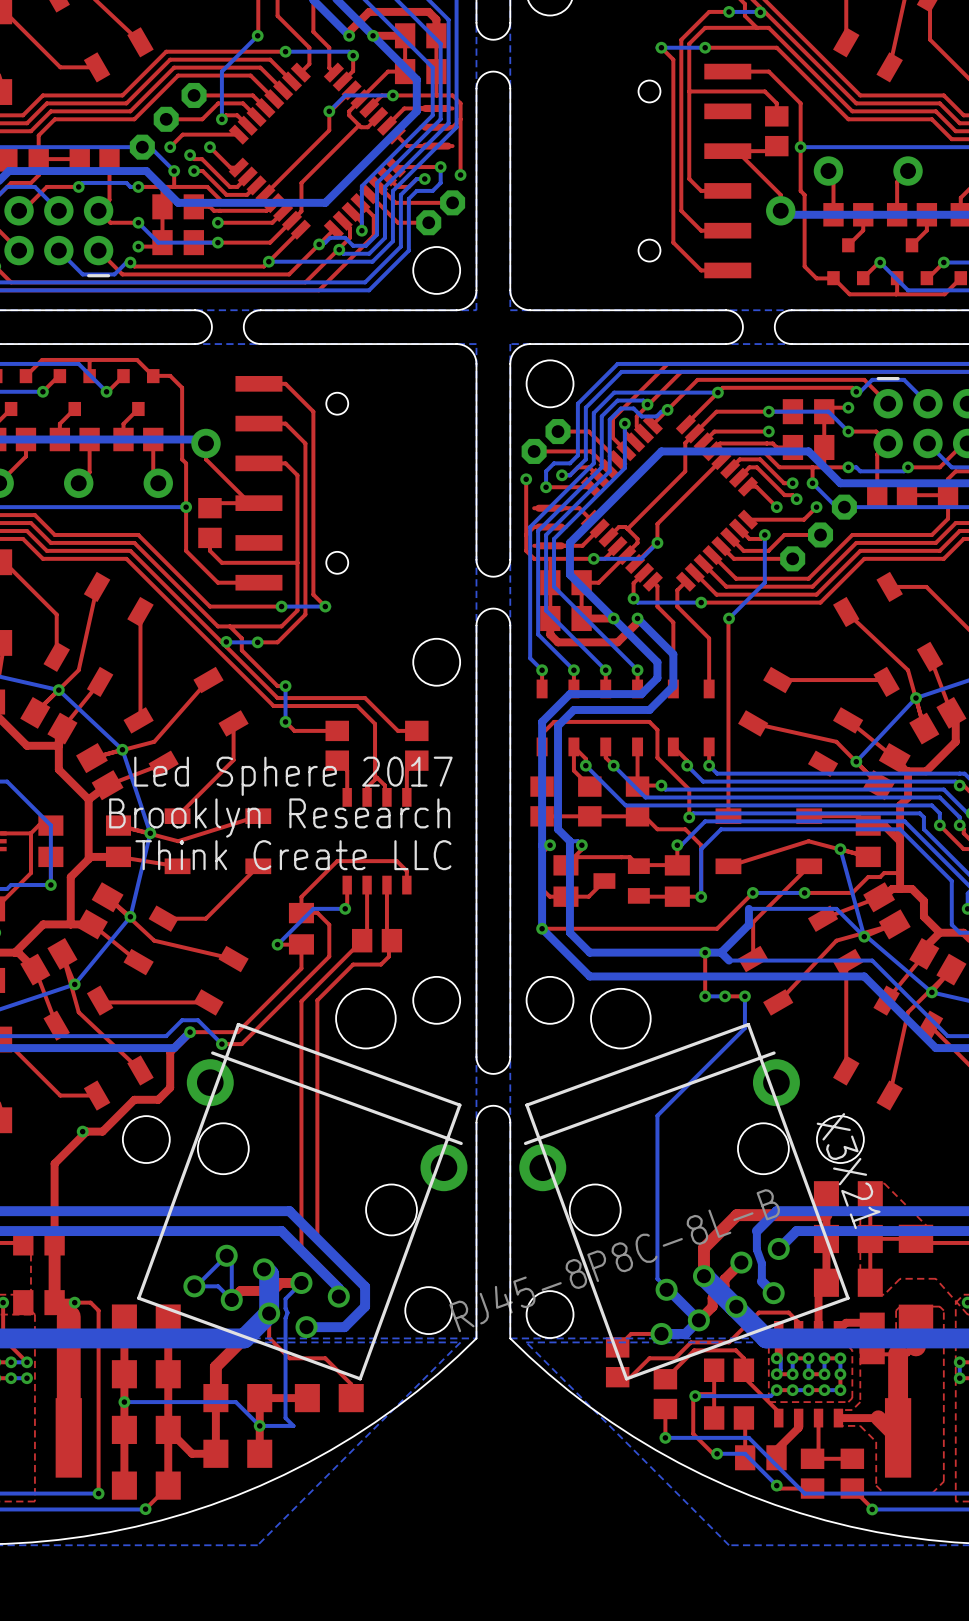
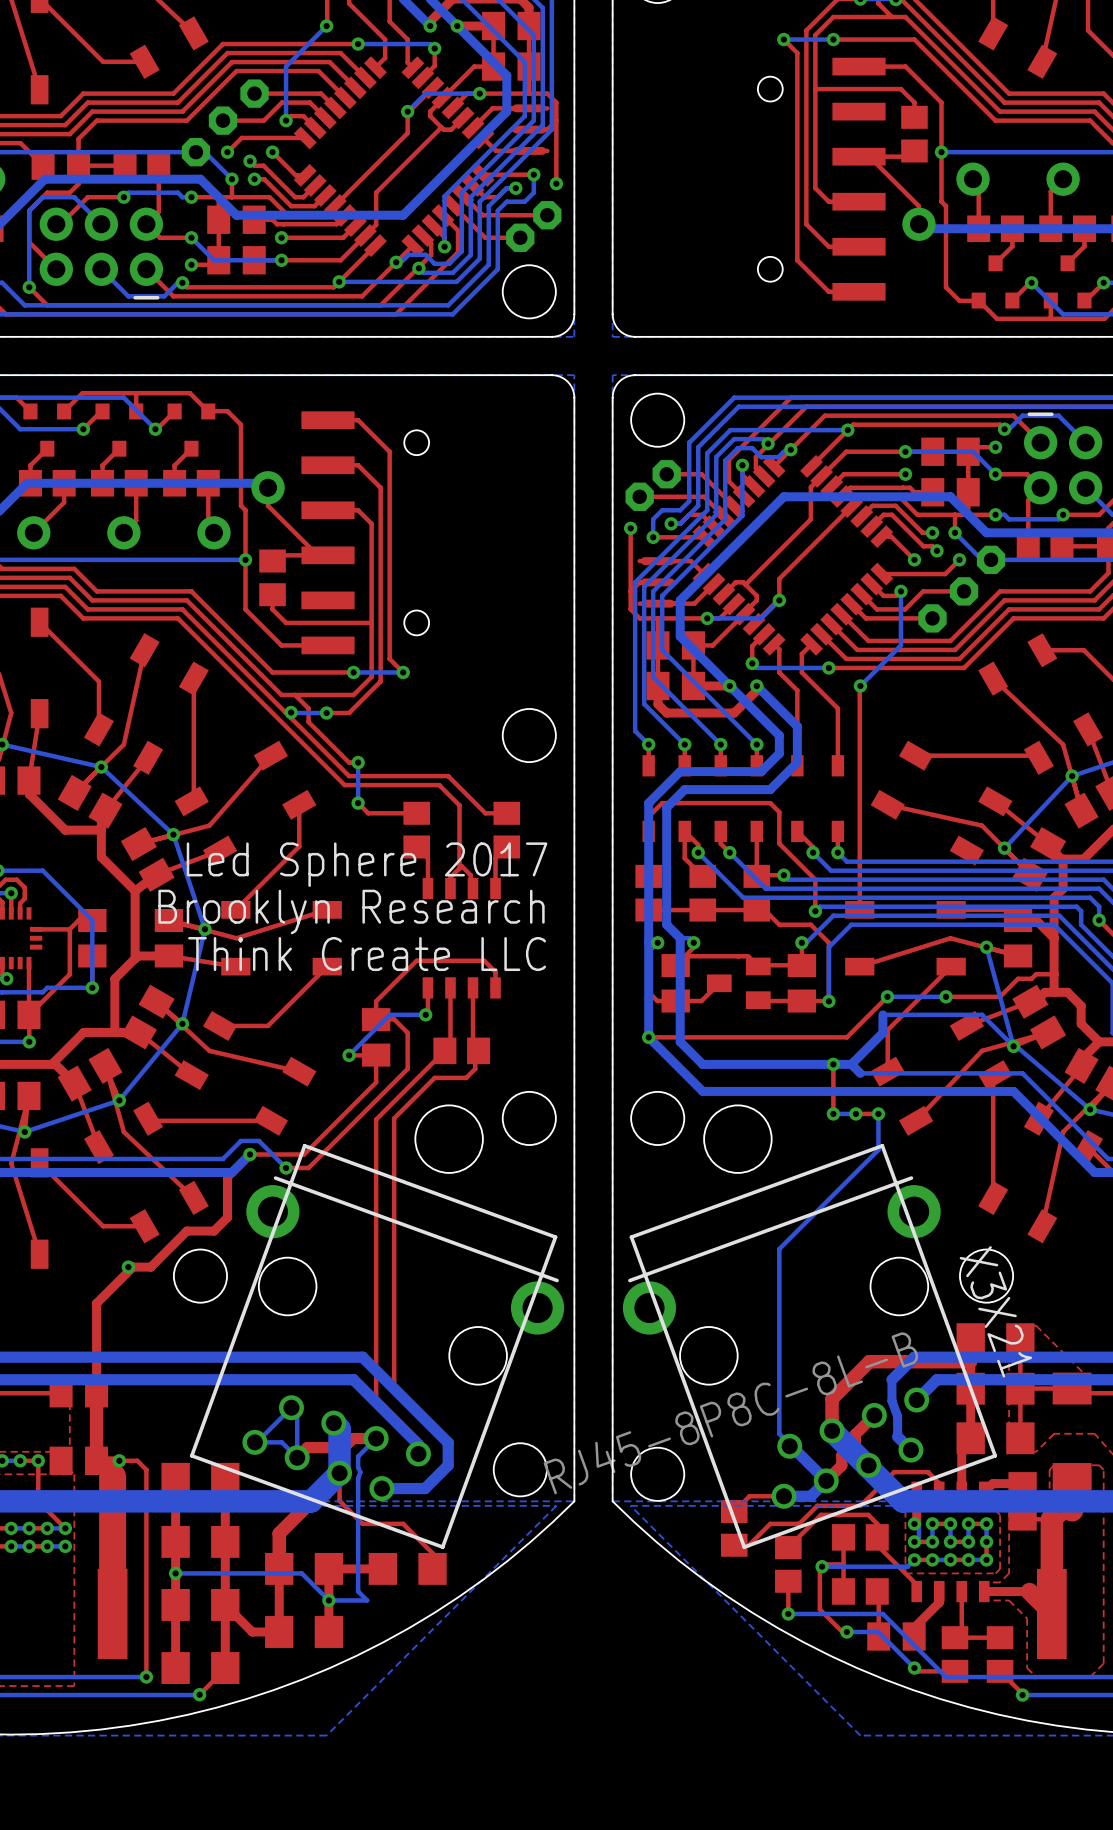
board edge: (510, 22) (505, 34) (493, 39) (481, 34) (476, 22) -> (612, 11) (612, 85)
board edge: (510, 88) (505, 76) (493, 71) (481, 76) (476, 88) -> (574, 11) (574, 85)
board edge: (195, 310) (207, 315) (211, 327) (207, 339) (195, 344) -> (329, 375) (255, 375)
board edge: (260, 310) (248, 315) (243, 327) (248, 339) (260, 344) -> (329, 336) (255, 336)
board edge: (726, 310) (738, 315) (742, 327) (738, 339) (726, 344) -> (931, 375) (857, 375)
board edge: (791, 310) (779, 315) (774, 327) (779, 339) (791, 344) -> (931, 336) (857, 336)
board edge: (510, 559) (505, 571) (493, 576) (481, 571) (476, 559) -> (612, 619) (612, 693)
board edge: (510, 625) (505, 613) (493, 608) (481, 613) (476, 625) -> (574, 619) (574, 693)
board edge: (510, 1057) (505, 1068) (493, 1073) (481, 1068) (476, 1057) -> (612, 1182) (612, 1256)
board edge: (510, 1122) (505, 1110) (493, 1105) (481, 1110) (476, 1122) -> (574, 1182) (574, 1256)

